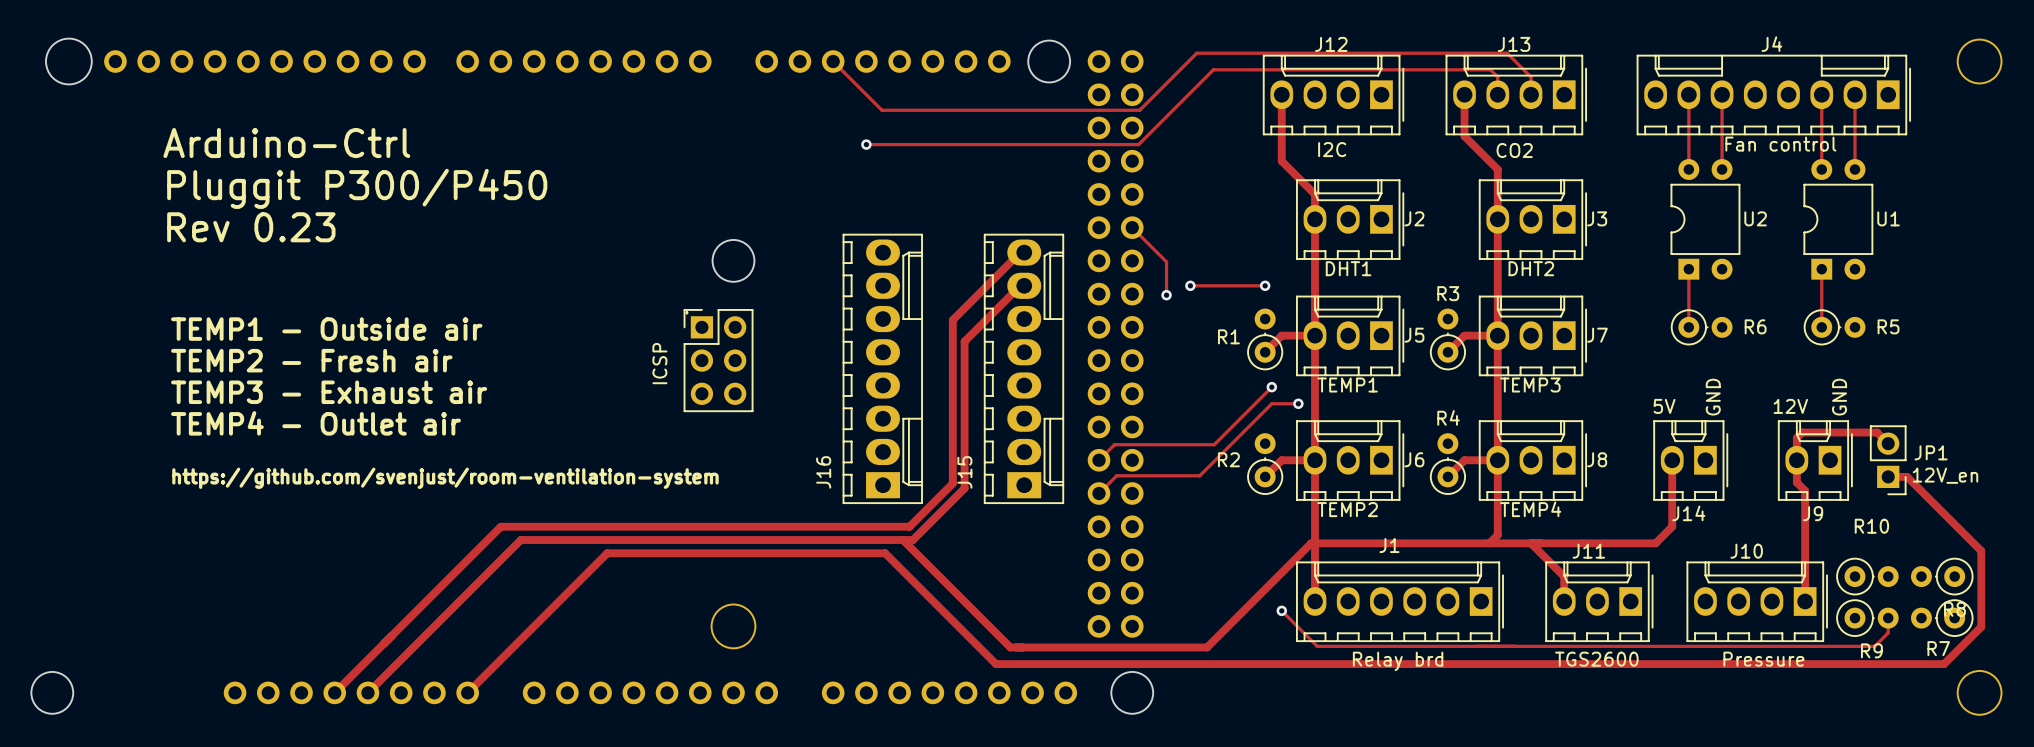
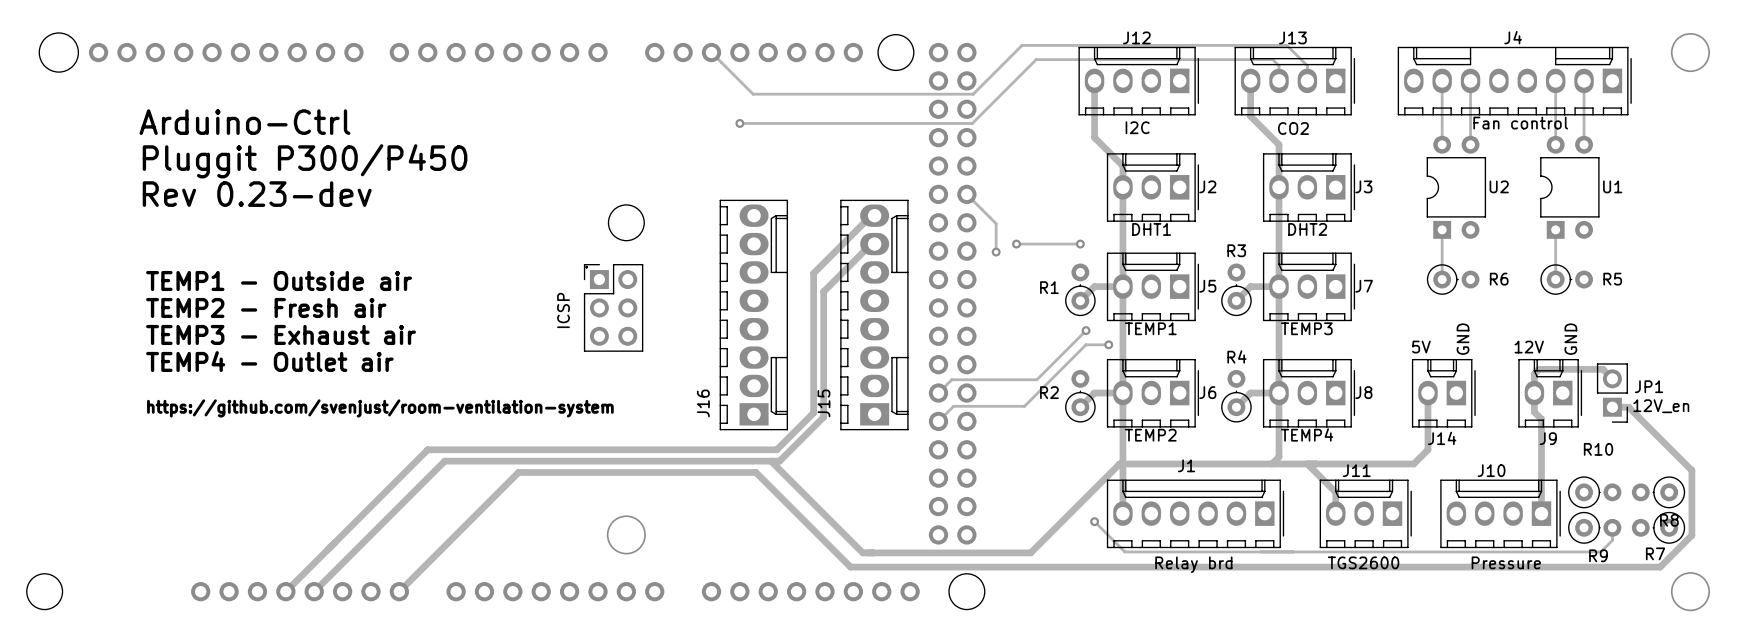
text: Rev 0.23 (251, 227) -> Rev 0.23-dev (257, 194)

